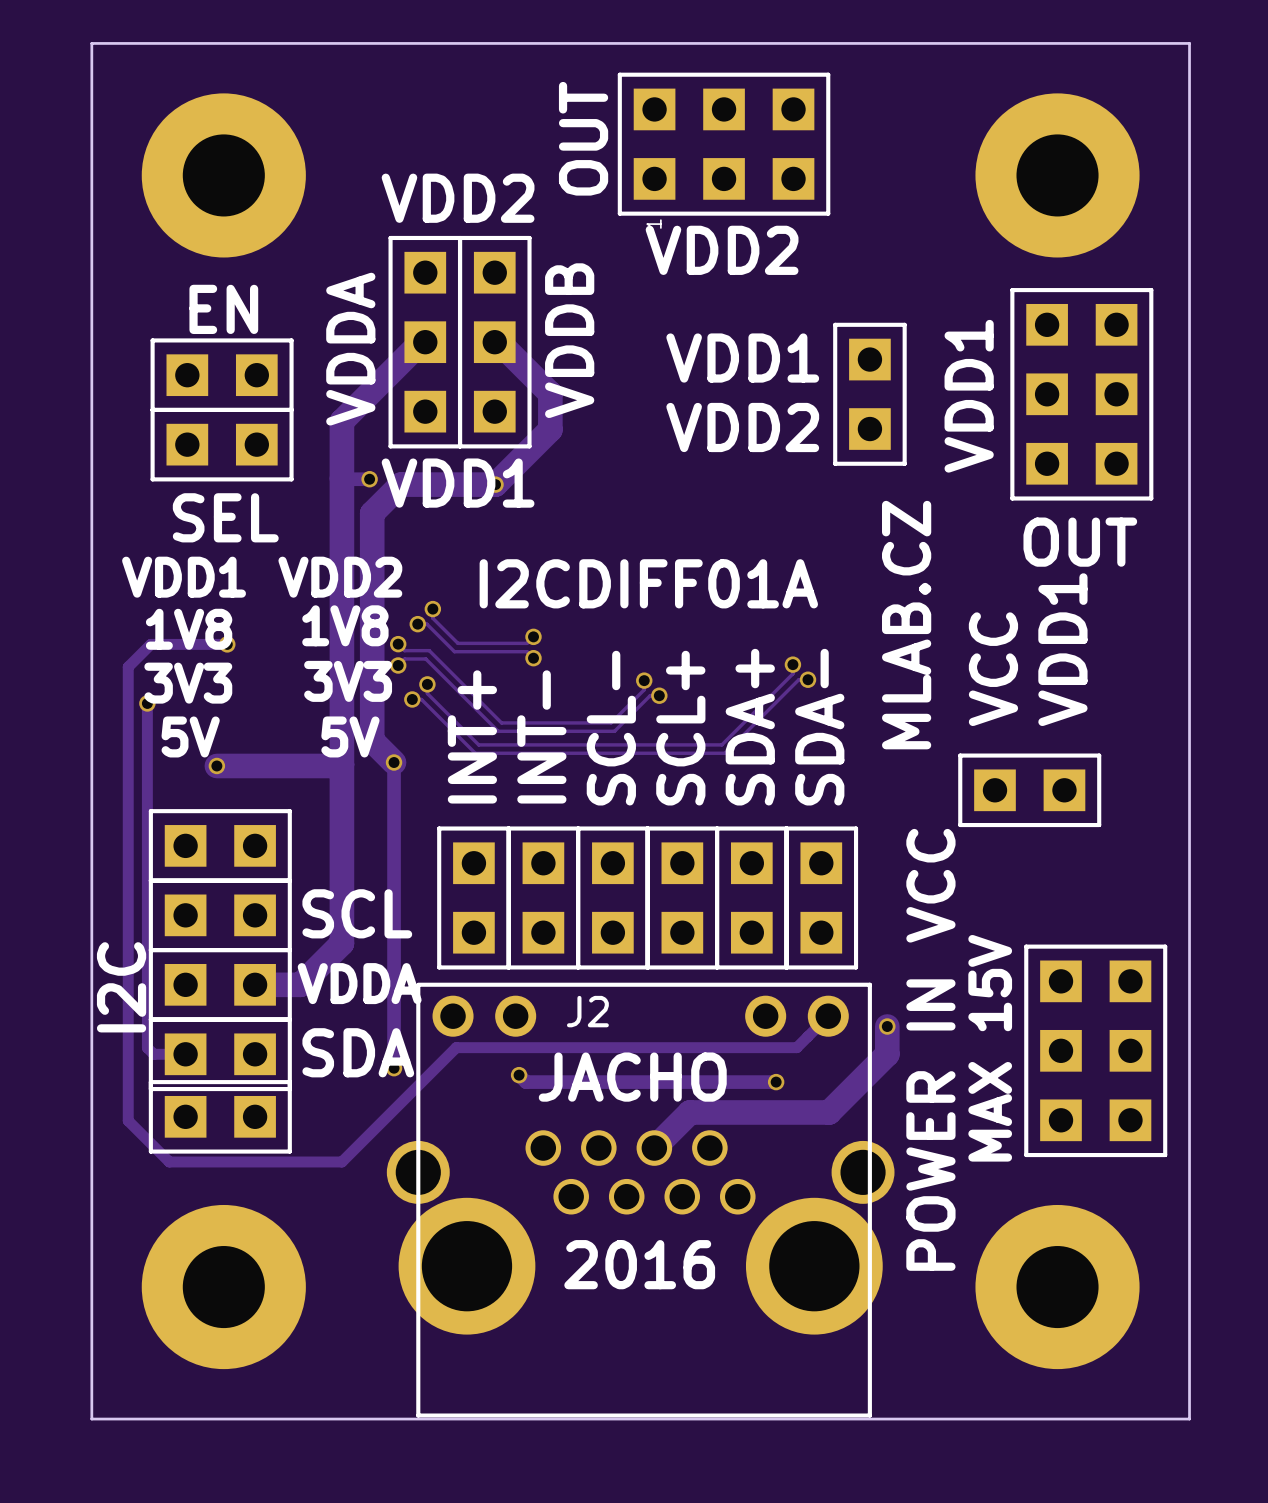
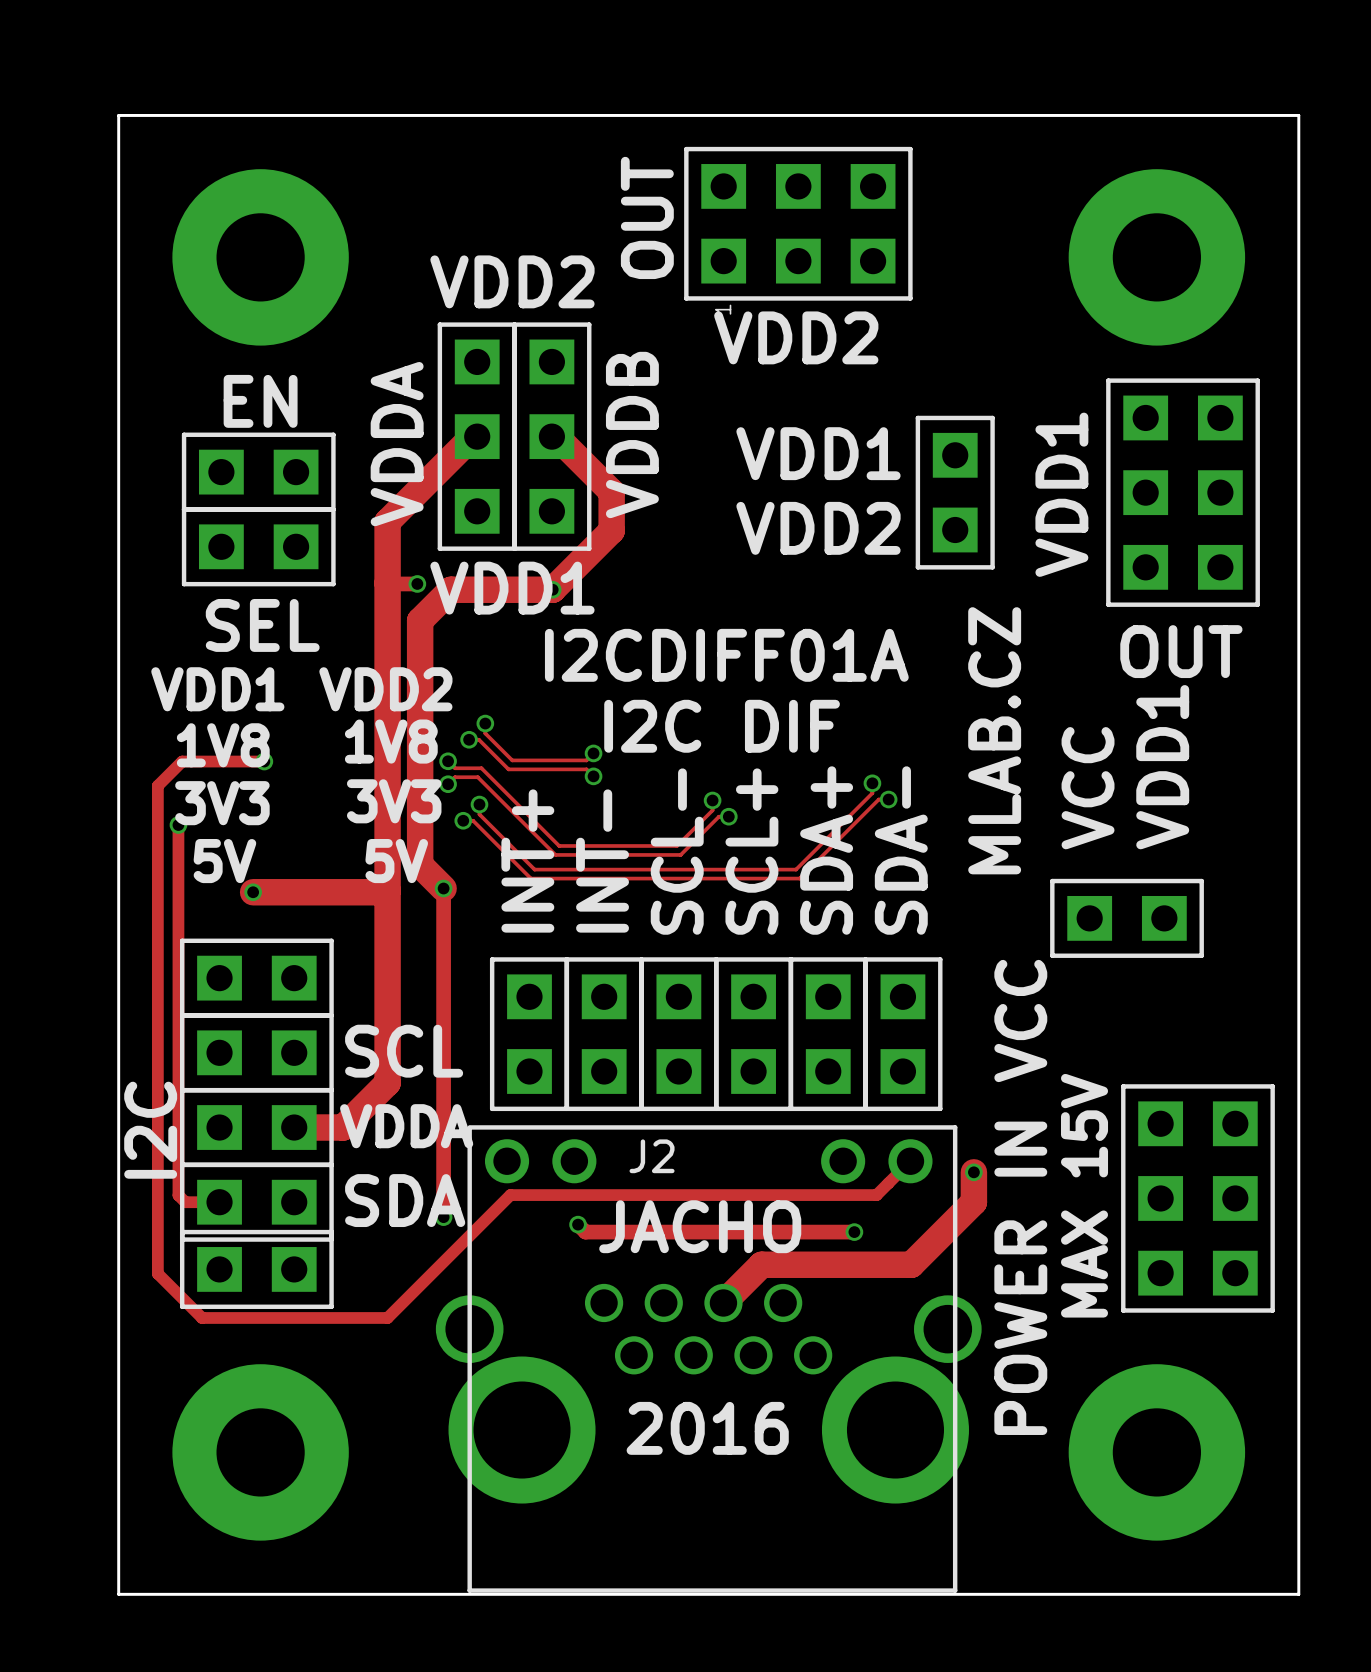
text position: I2CDIFF01A (648, 583) -> I2CDIFF01A (726, 655)
text: none -> I2C DIF (722, 726)

